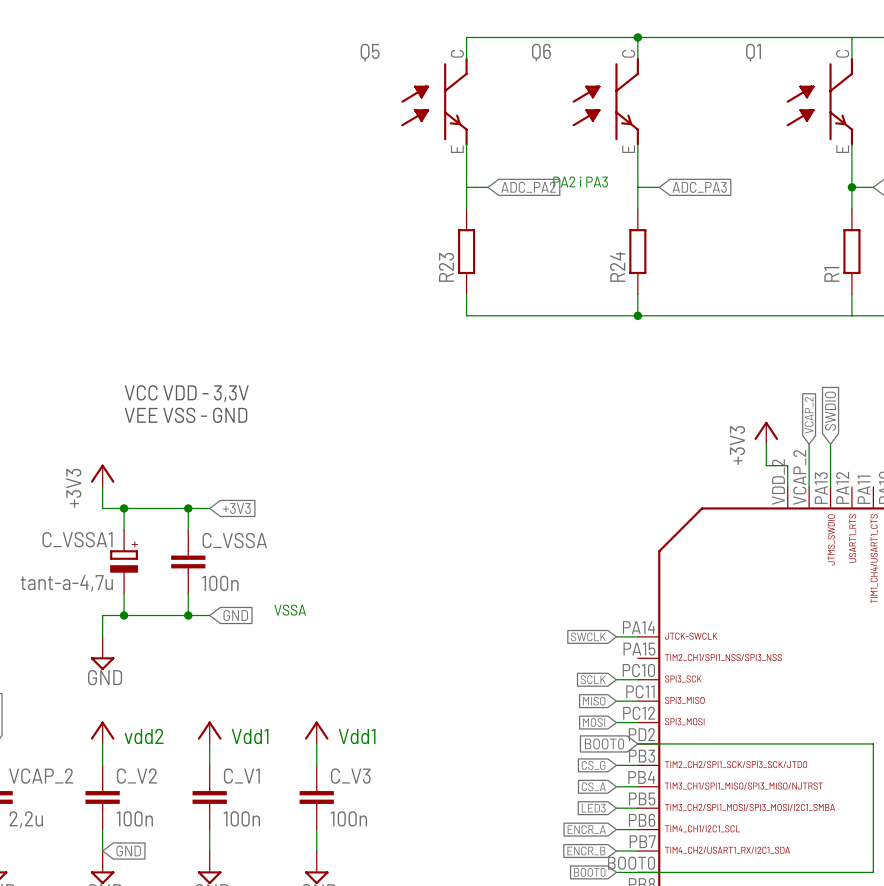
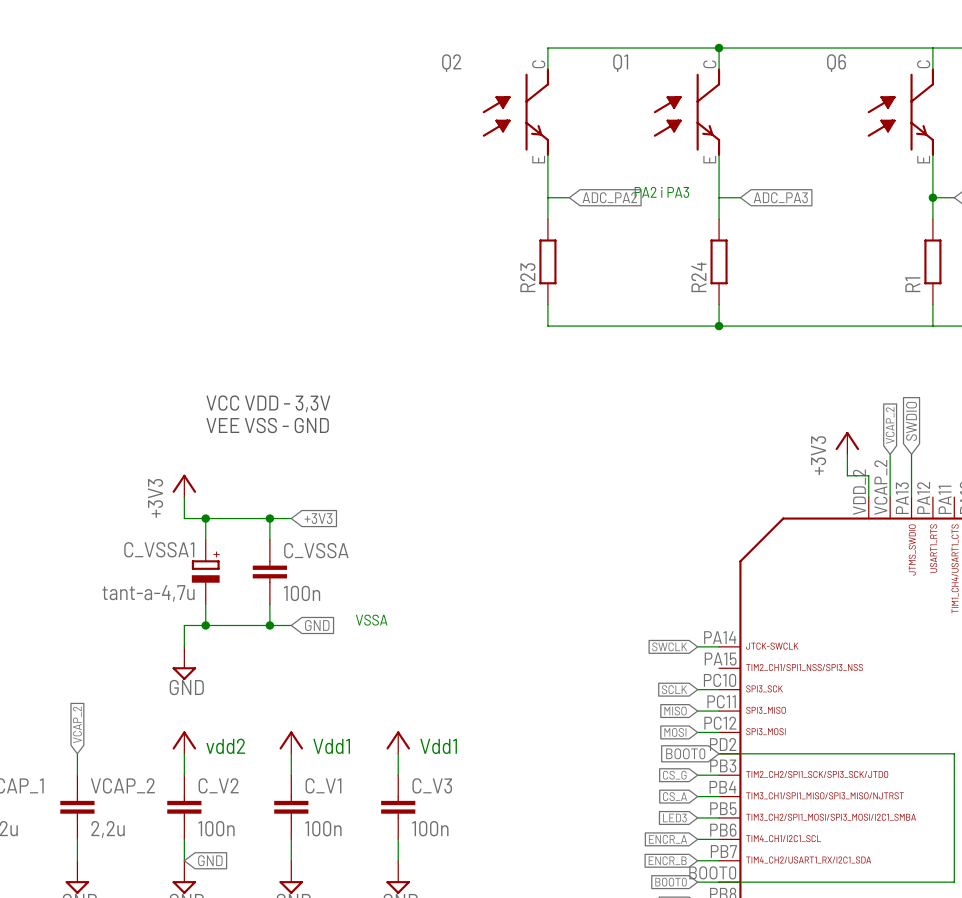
Q5 name: Q5 (370, 52) -> Q2 (451, 63)
Q6 name: Q6 (541, 52) -> Q1 (620, 63)
Q1 name: Q1 (753, 52) -> Q6 (836, 63)

